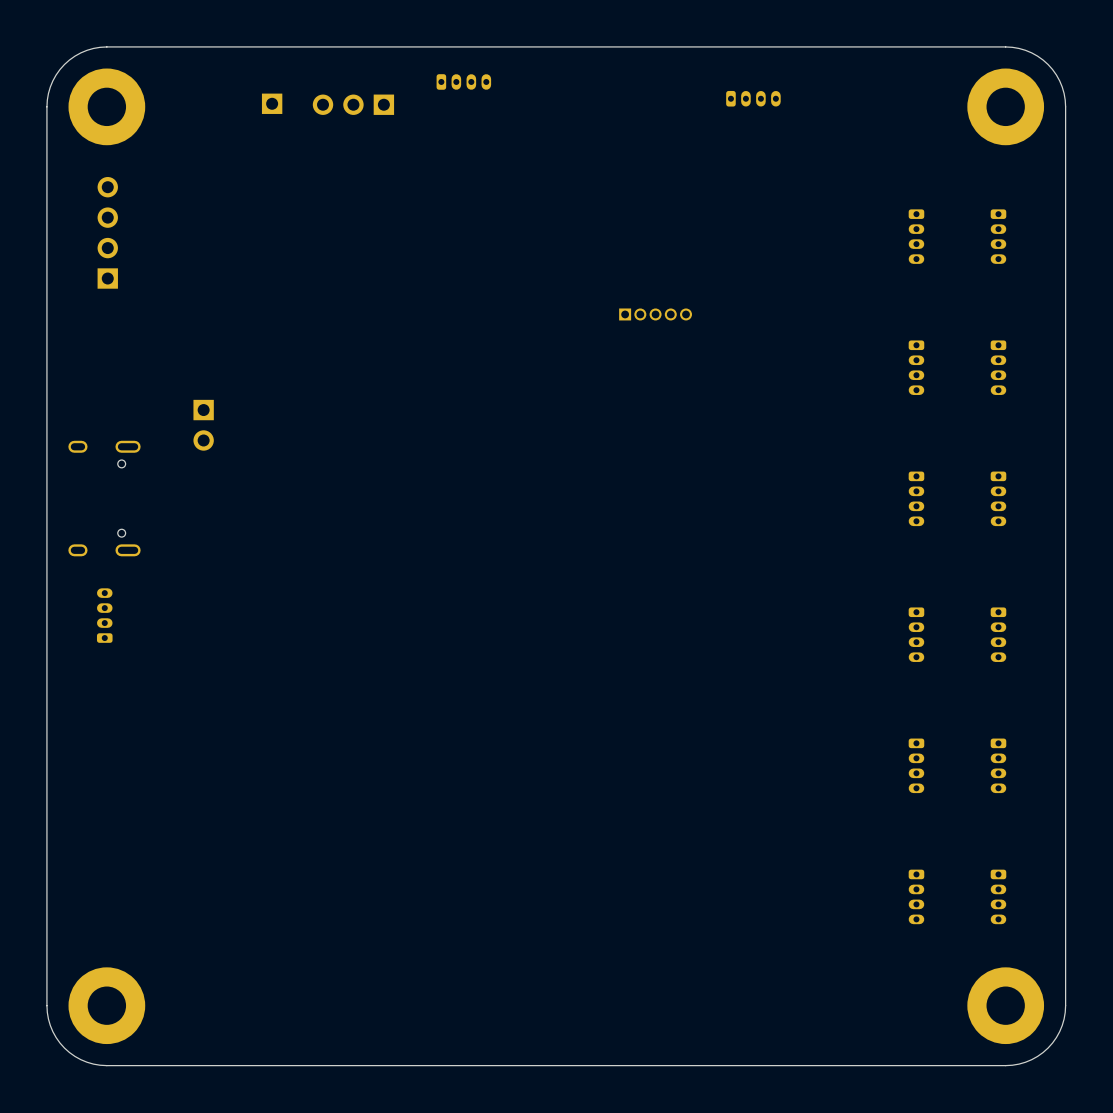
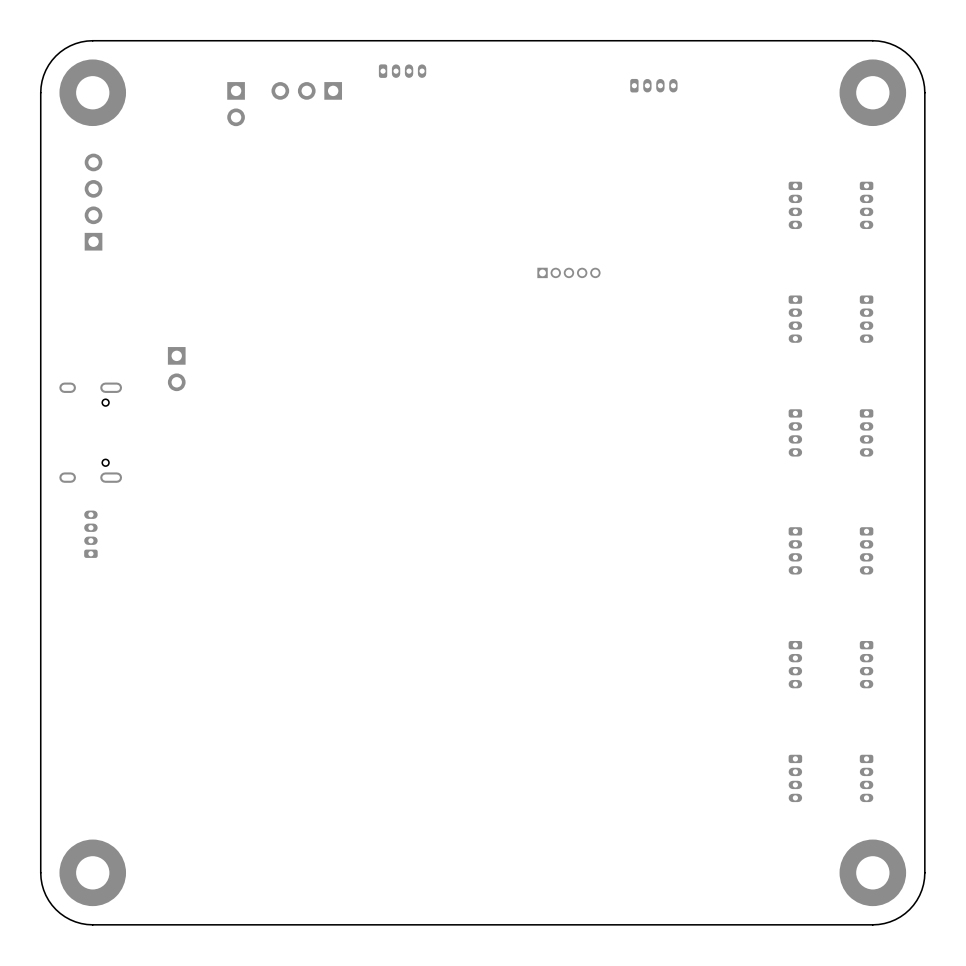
part: (272, 103) -> none
part: none -> (236, 104)

